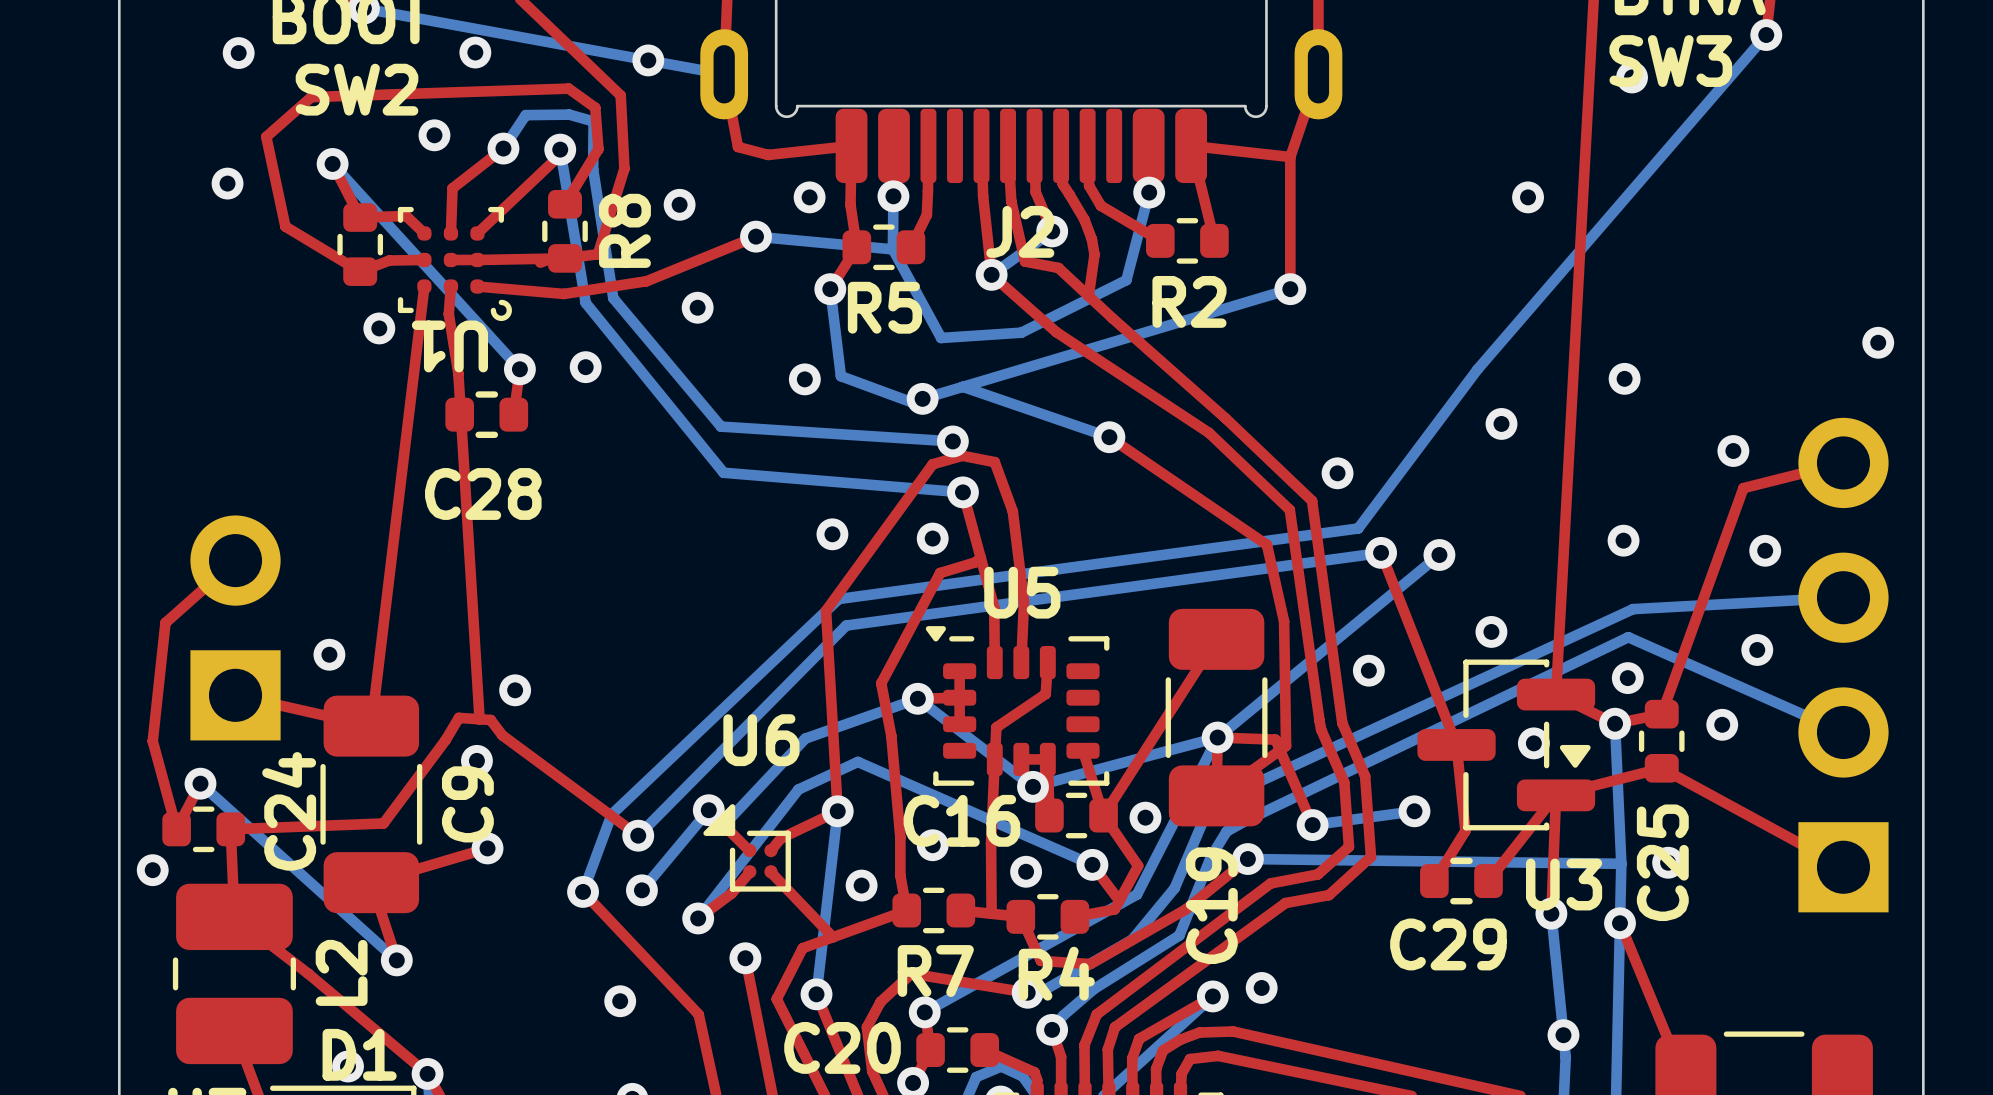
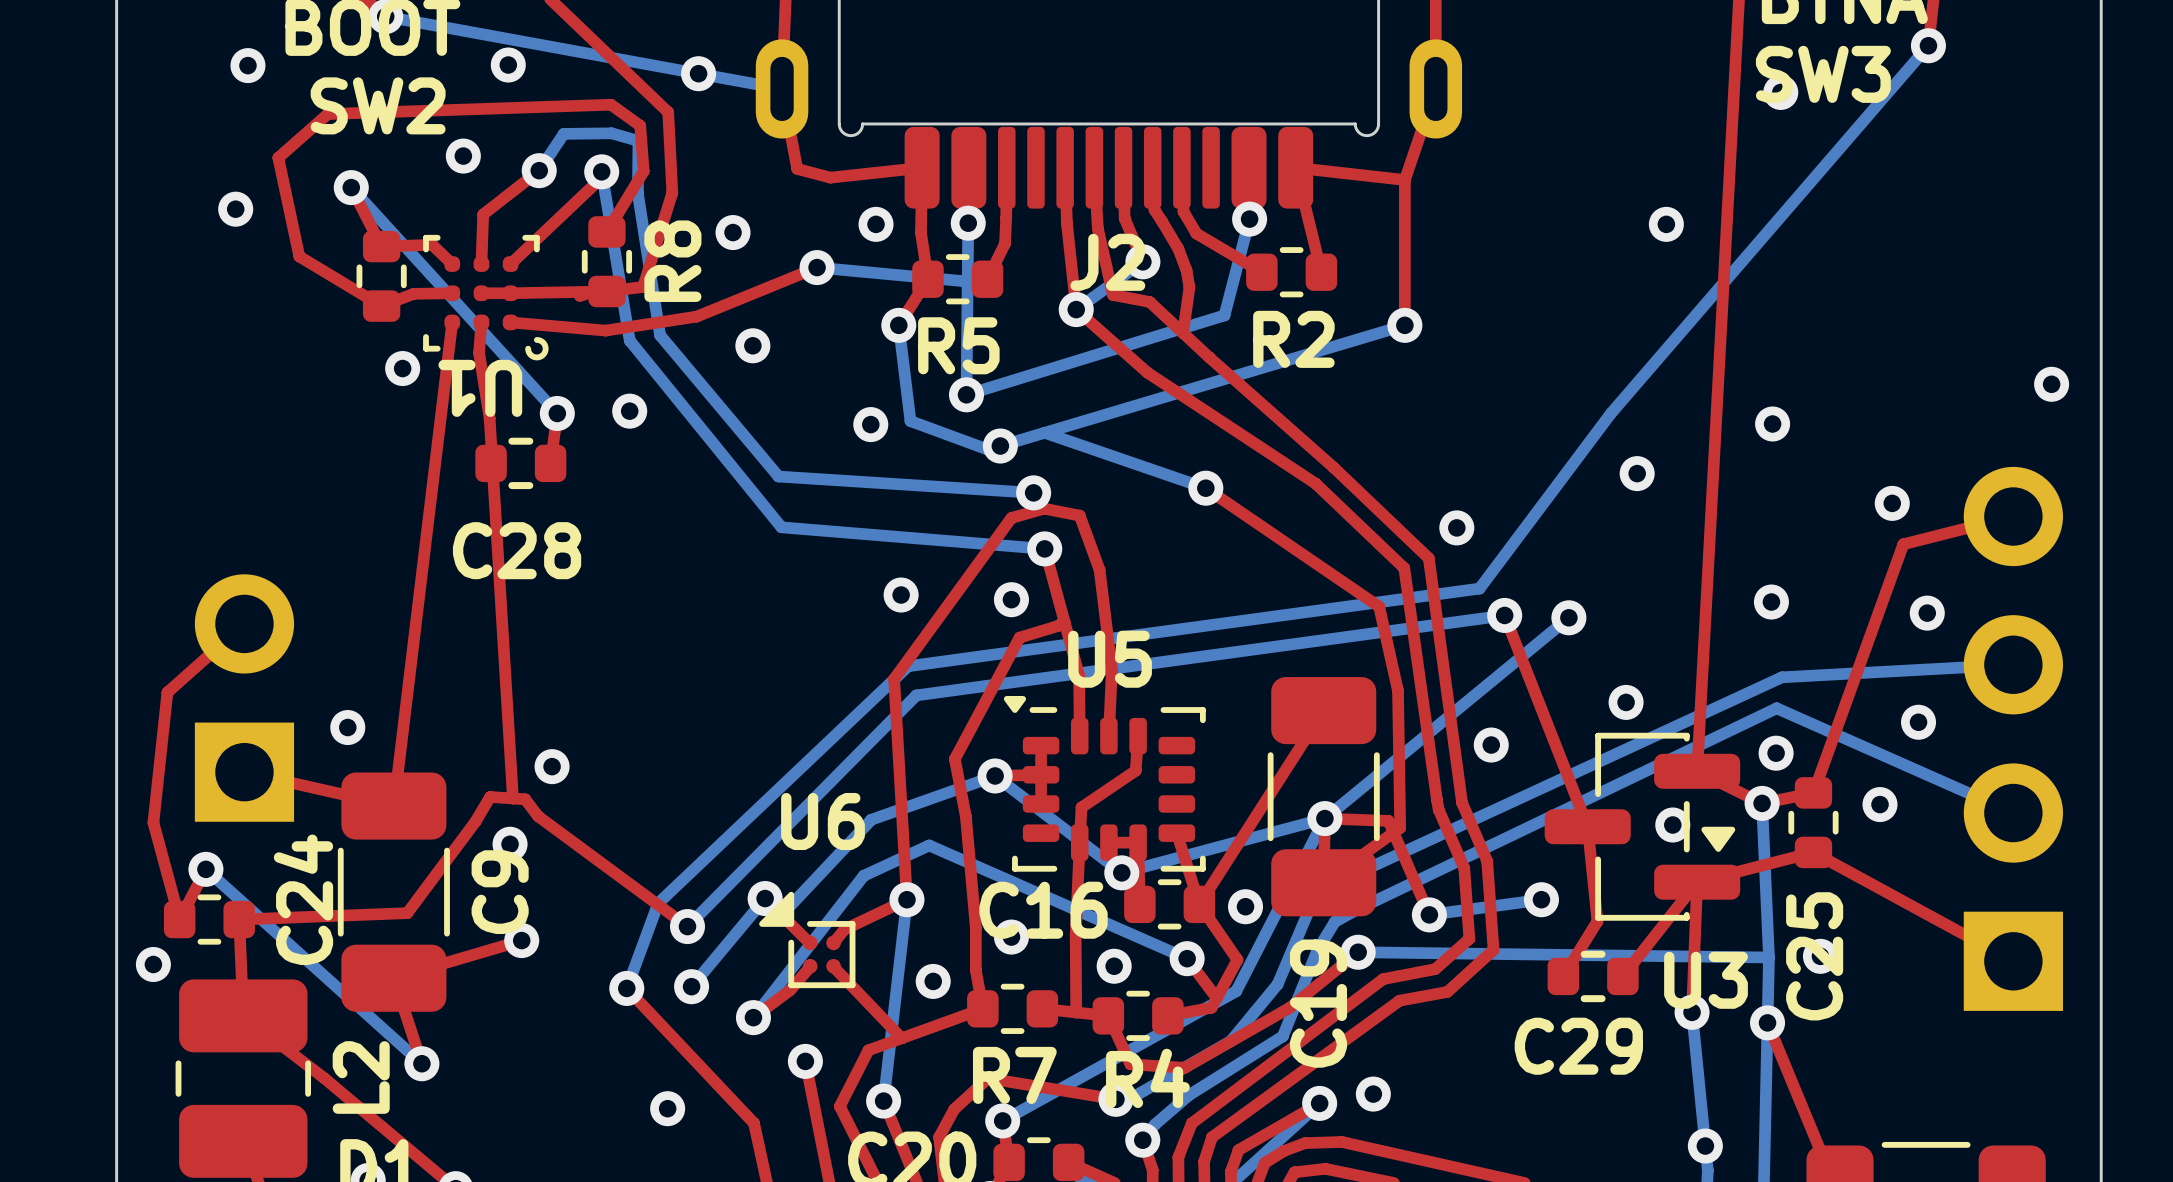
bottom track: (892, 249) (941, 337) (1021, 332) (1126, 280) -> (967, 281) (966, 394) (1224, 315)
via: none -> (966, 394)

